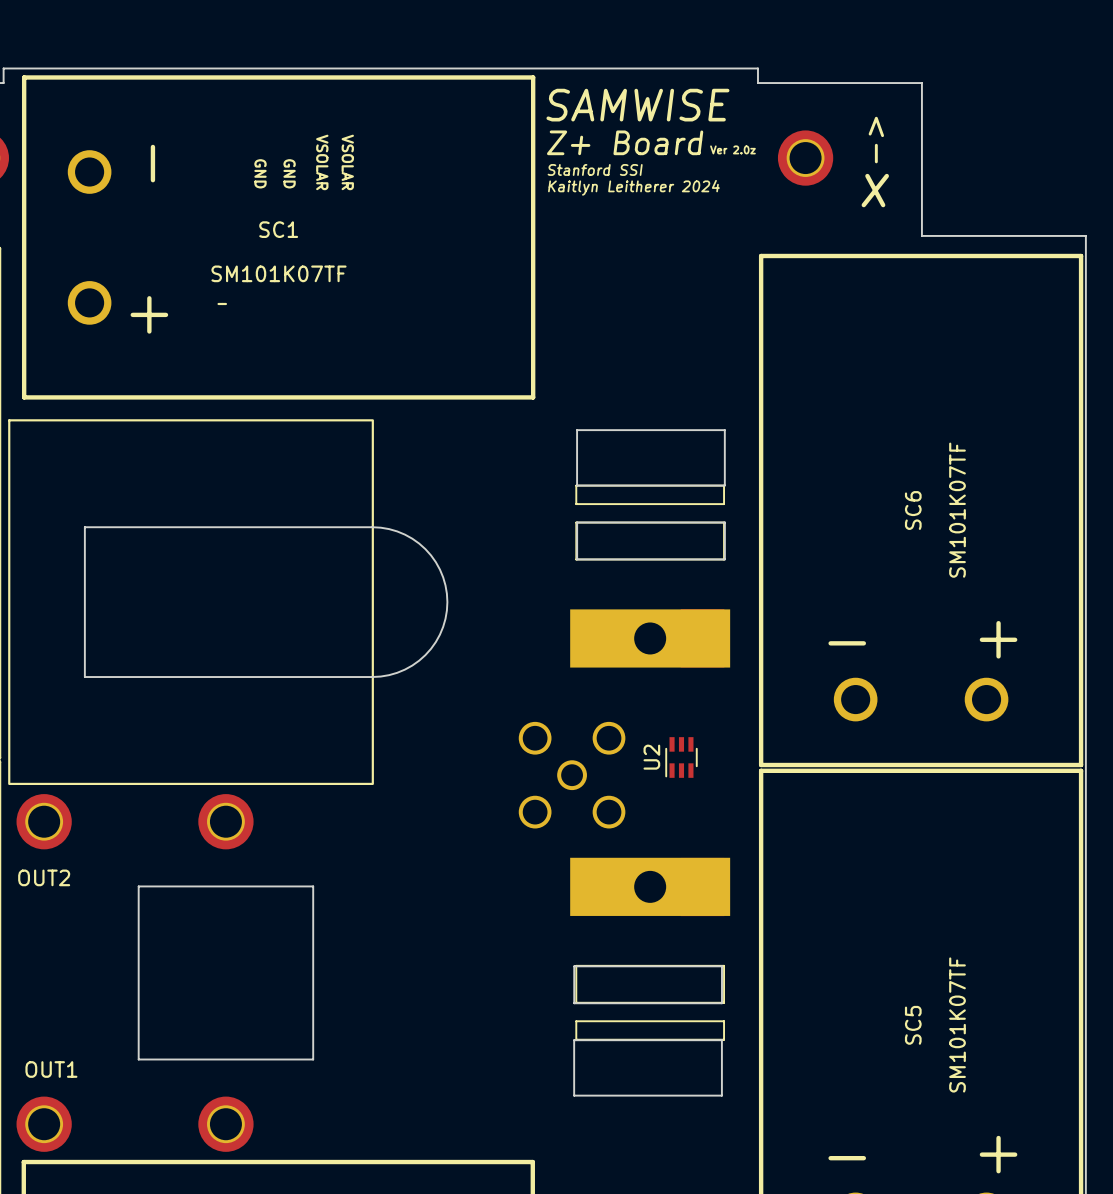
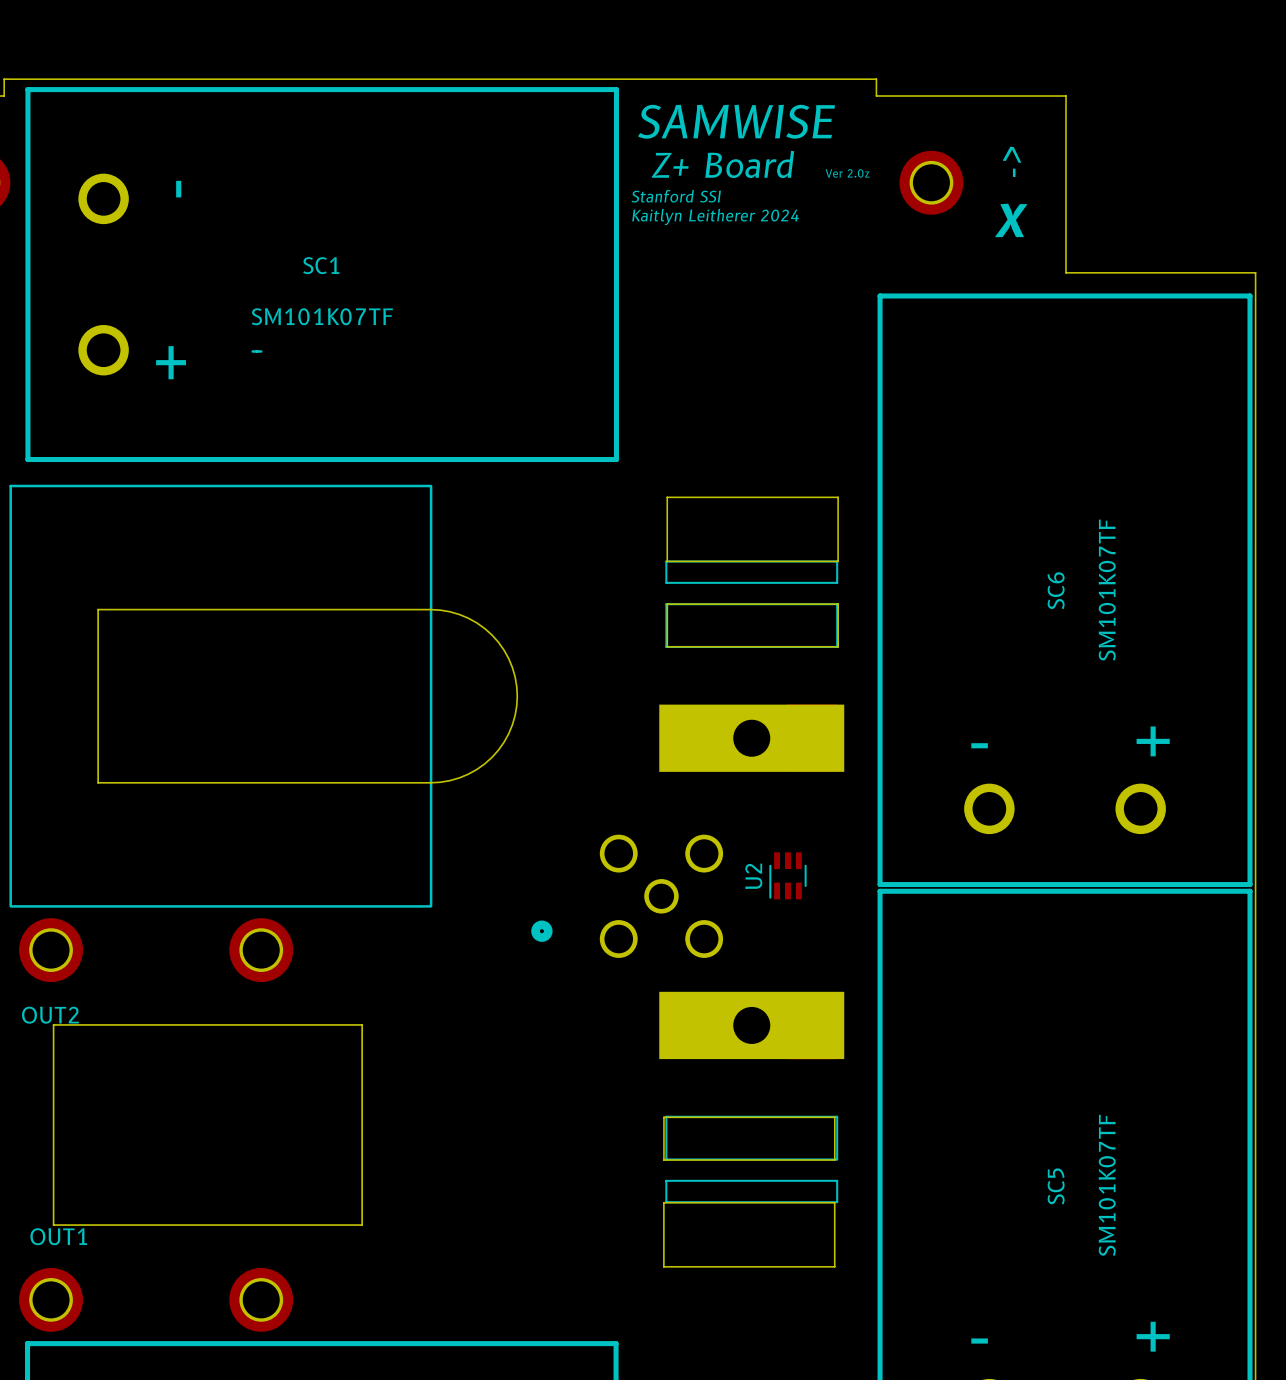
part: (304, 162) -> none
part: none -> (541, 931)
board edge: (138, 886) (138, 1059) -> (160, 1024) (53, 1024) (53, 1225) (160, 1225)

